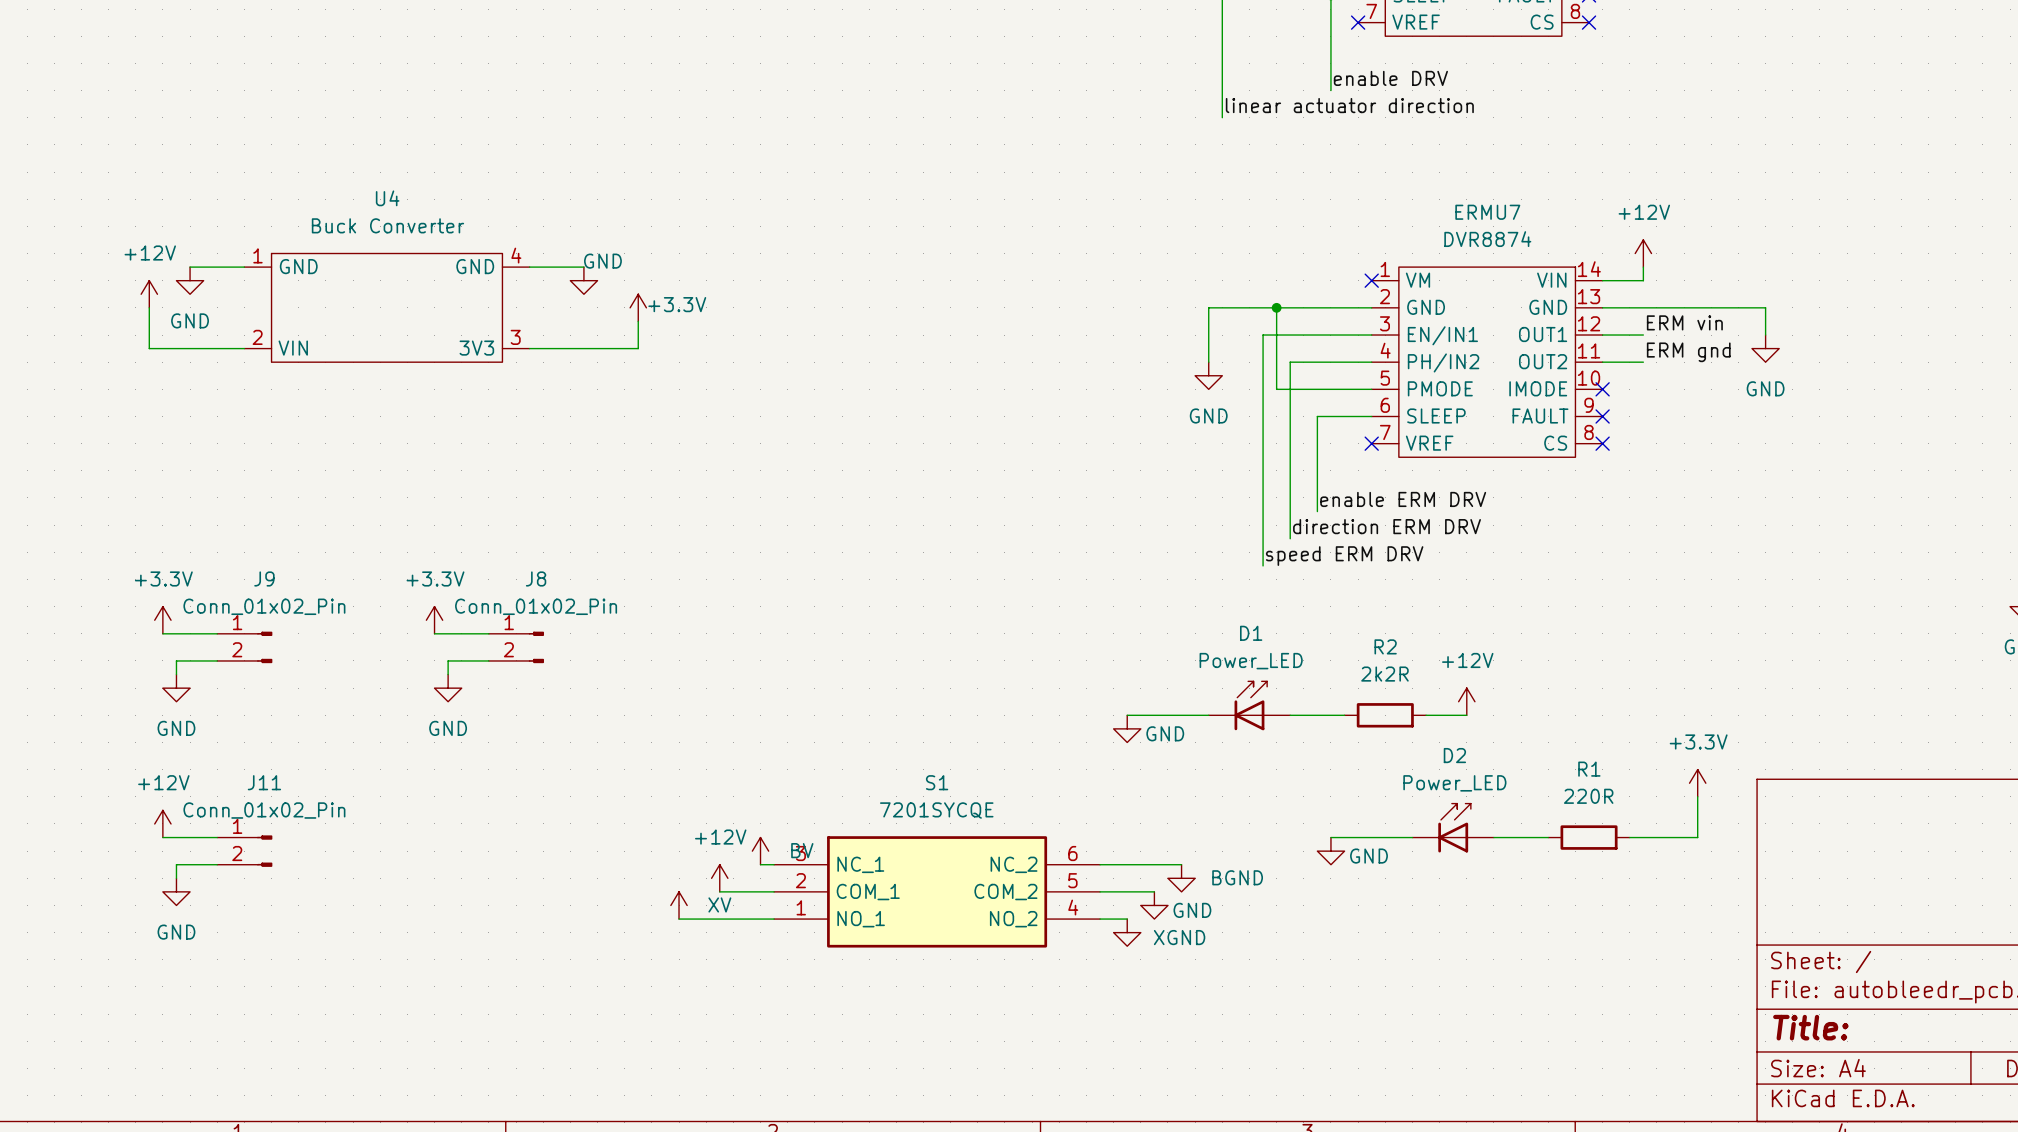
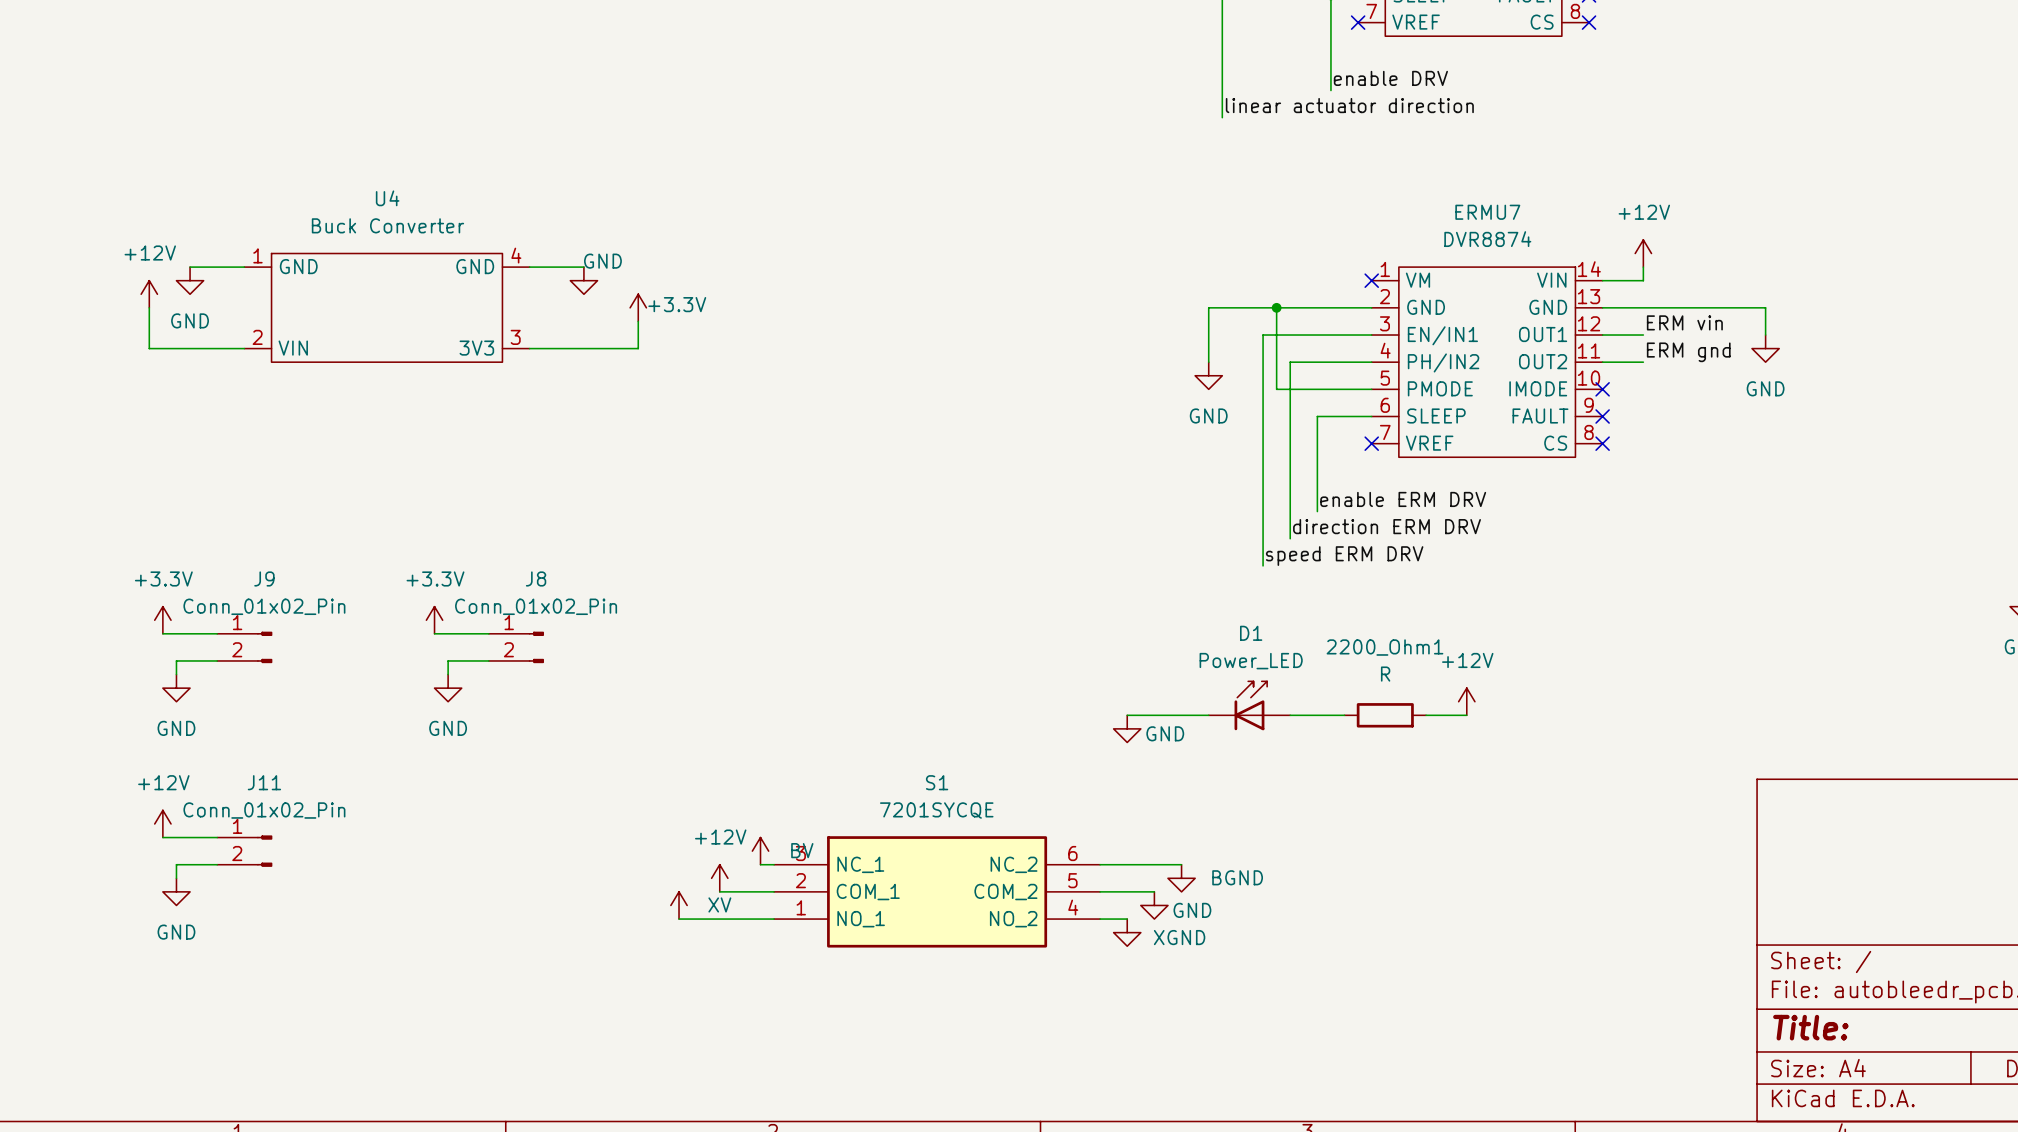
R2 name: R2 (1385, 646) -> 2200_Ohm1 (1384, 647)
R2 value: 2k2R (1384, 674) -> R (1385, 674)
power symbol: +3.3V (1697, 783) -> none
wire: (1697, 796) (1697, 837) (1629, 837) -> none
D2: Power_LED (1453, 828) -> none
wire: (1330, 837) (1412, 837) -> none
wire: (1493, 837) (1548, 837) -> none
R1: 220R (1589, 837) -> none
power symbol: GND (1330, 851) -> none

